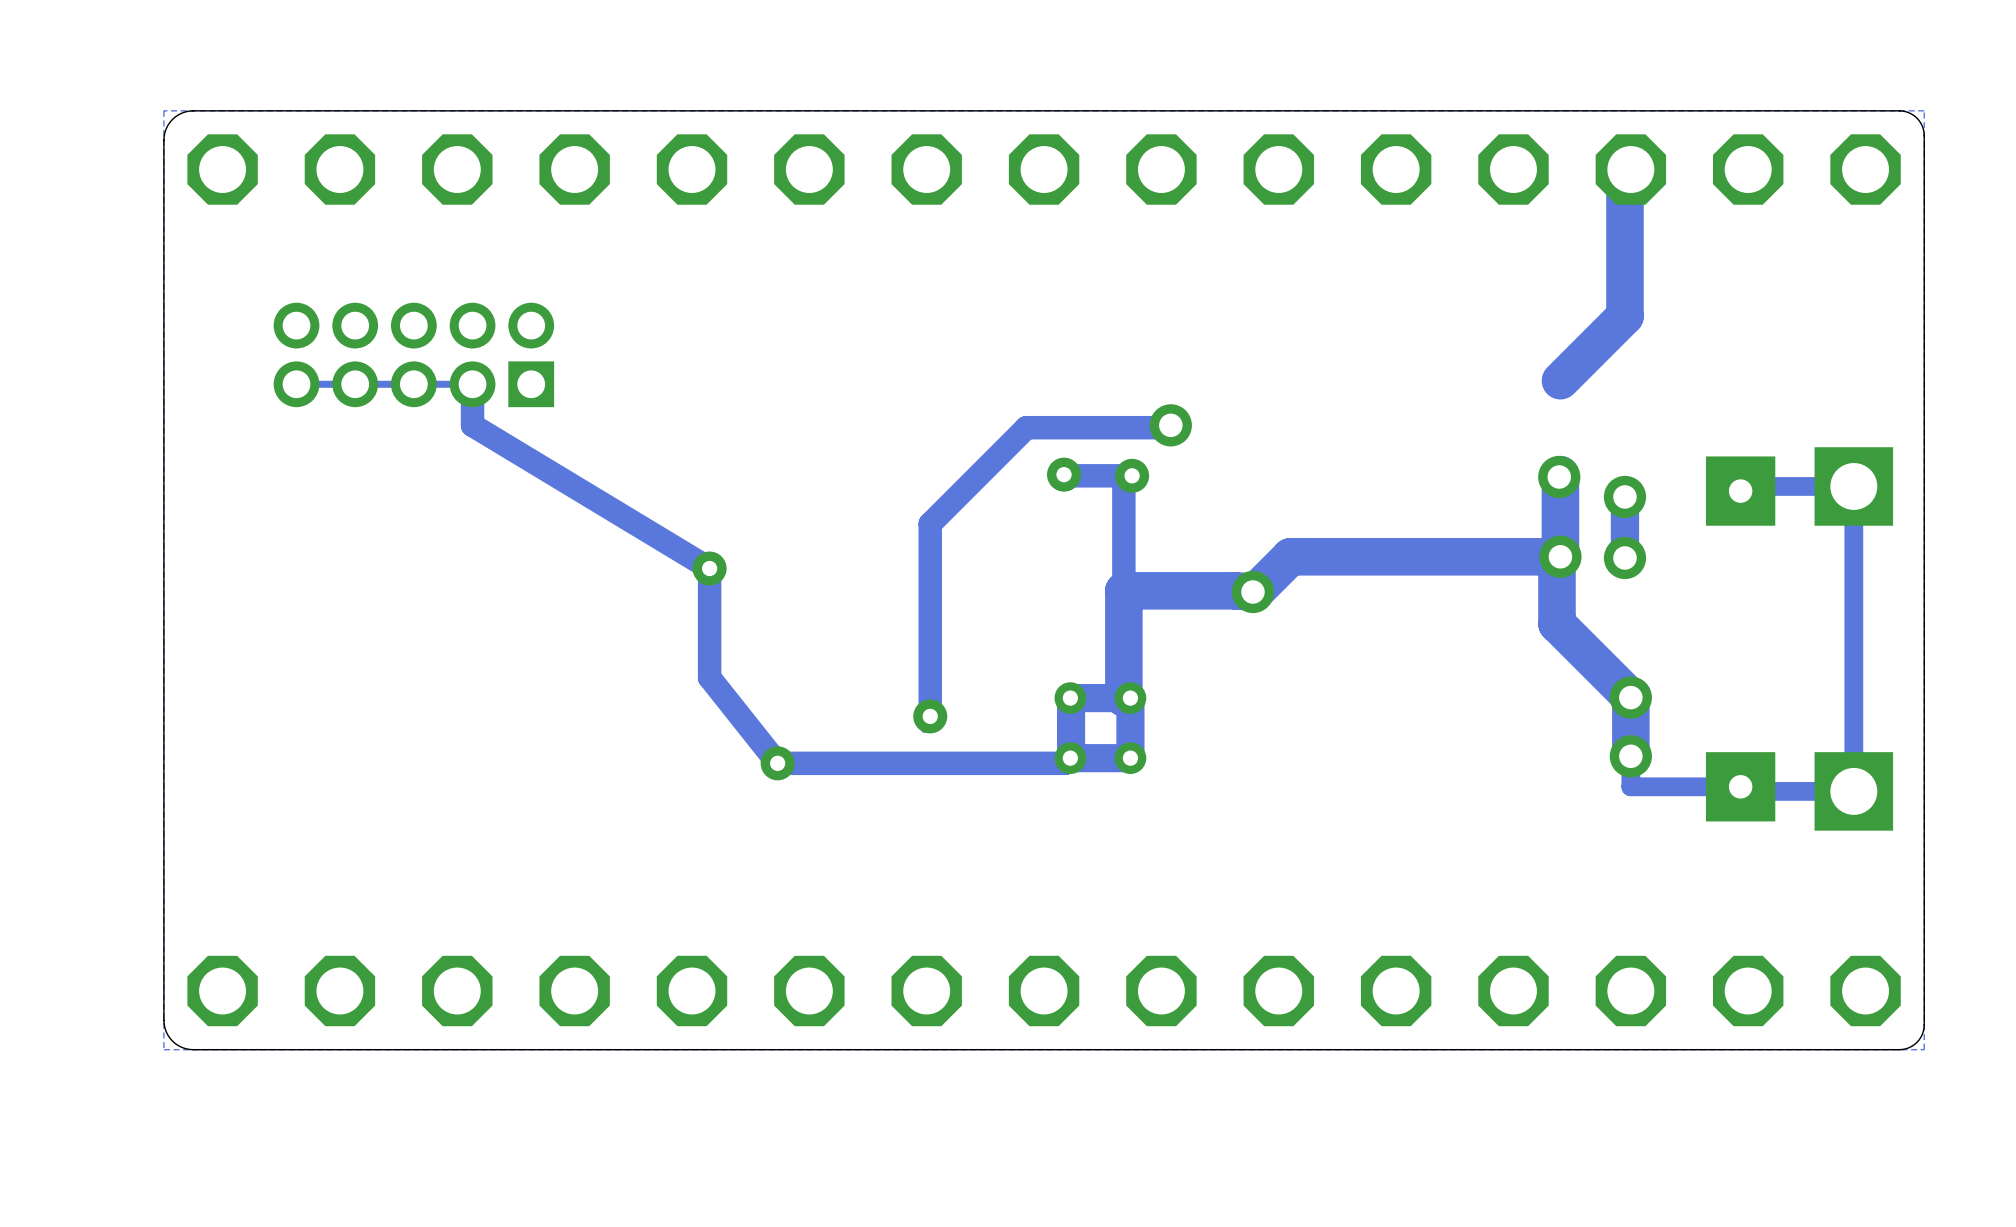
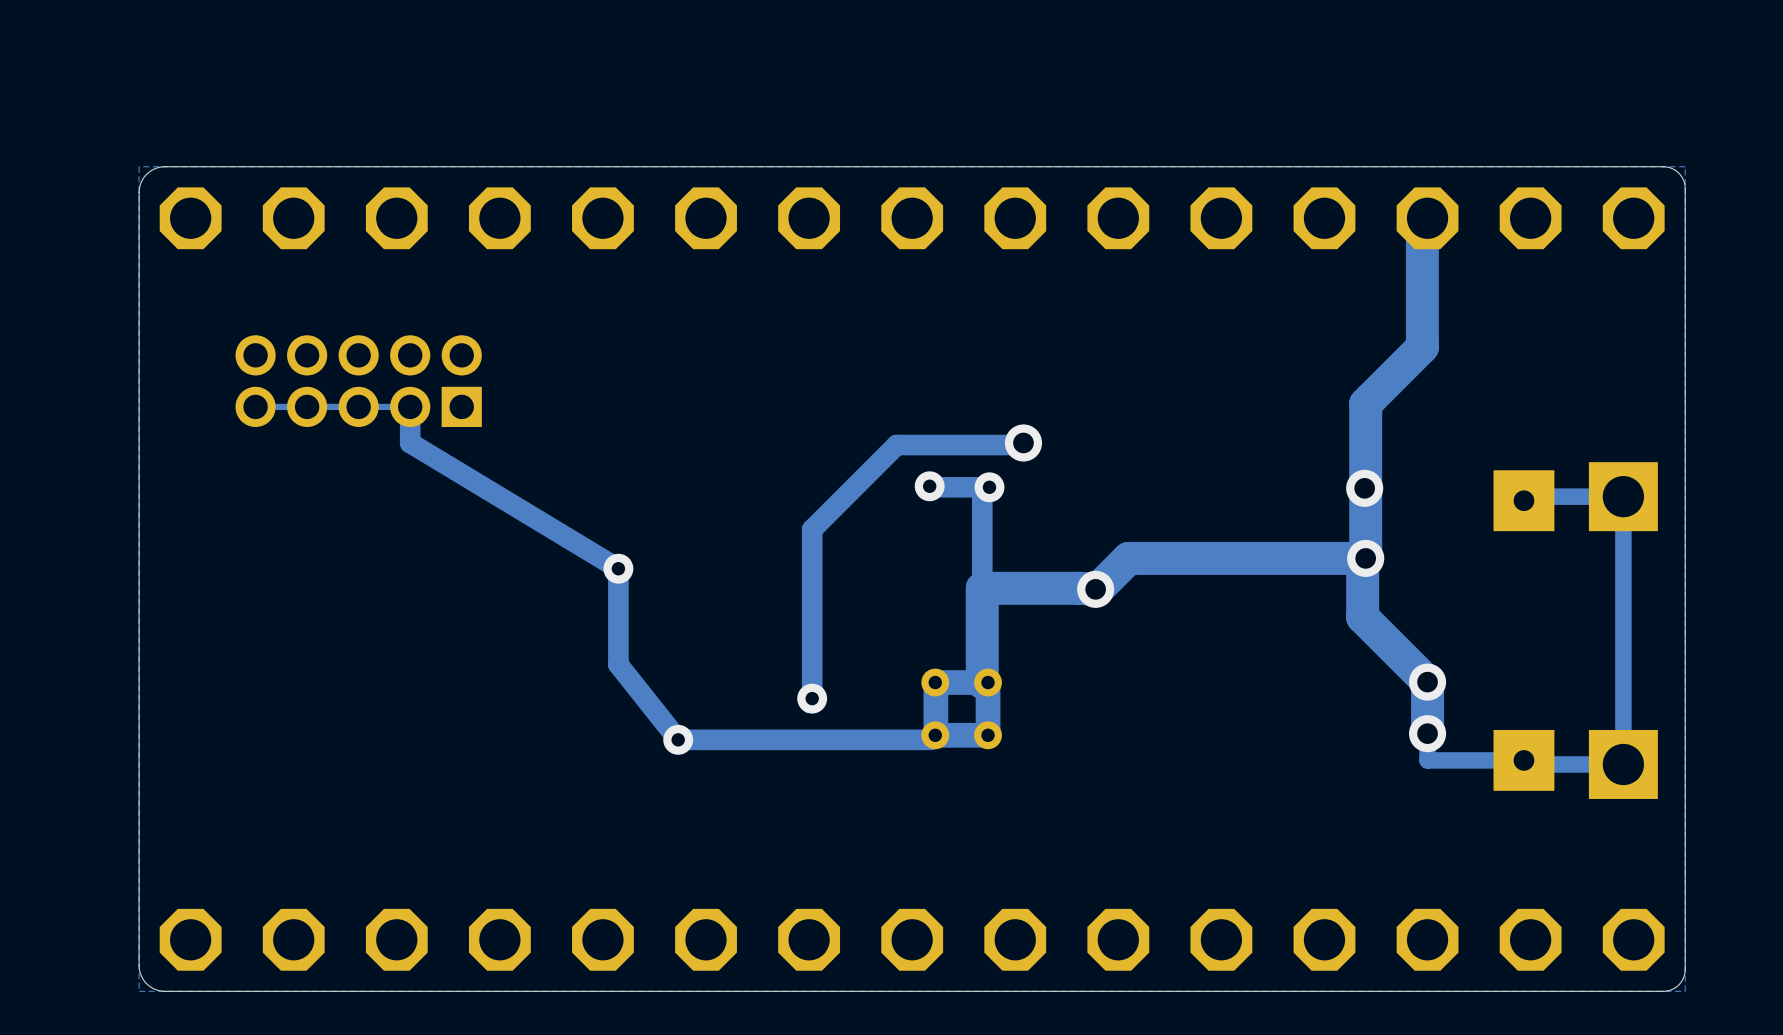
track: none -> (1365, 403) (1365, 486)
via: (1624, 496) -> none
via: (1624, 557) -> none

